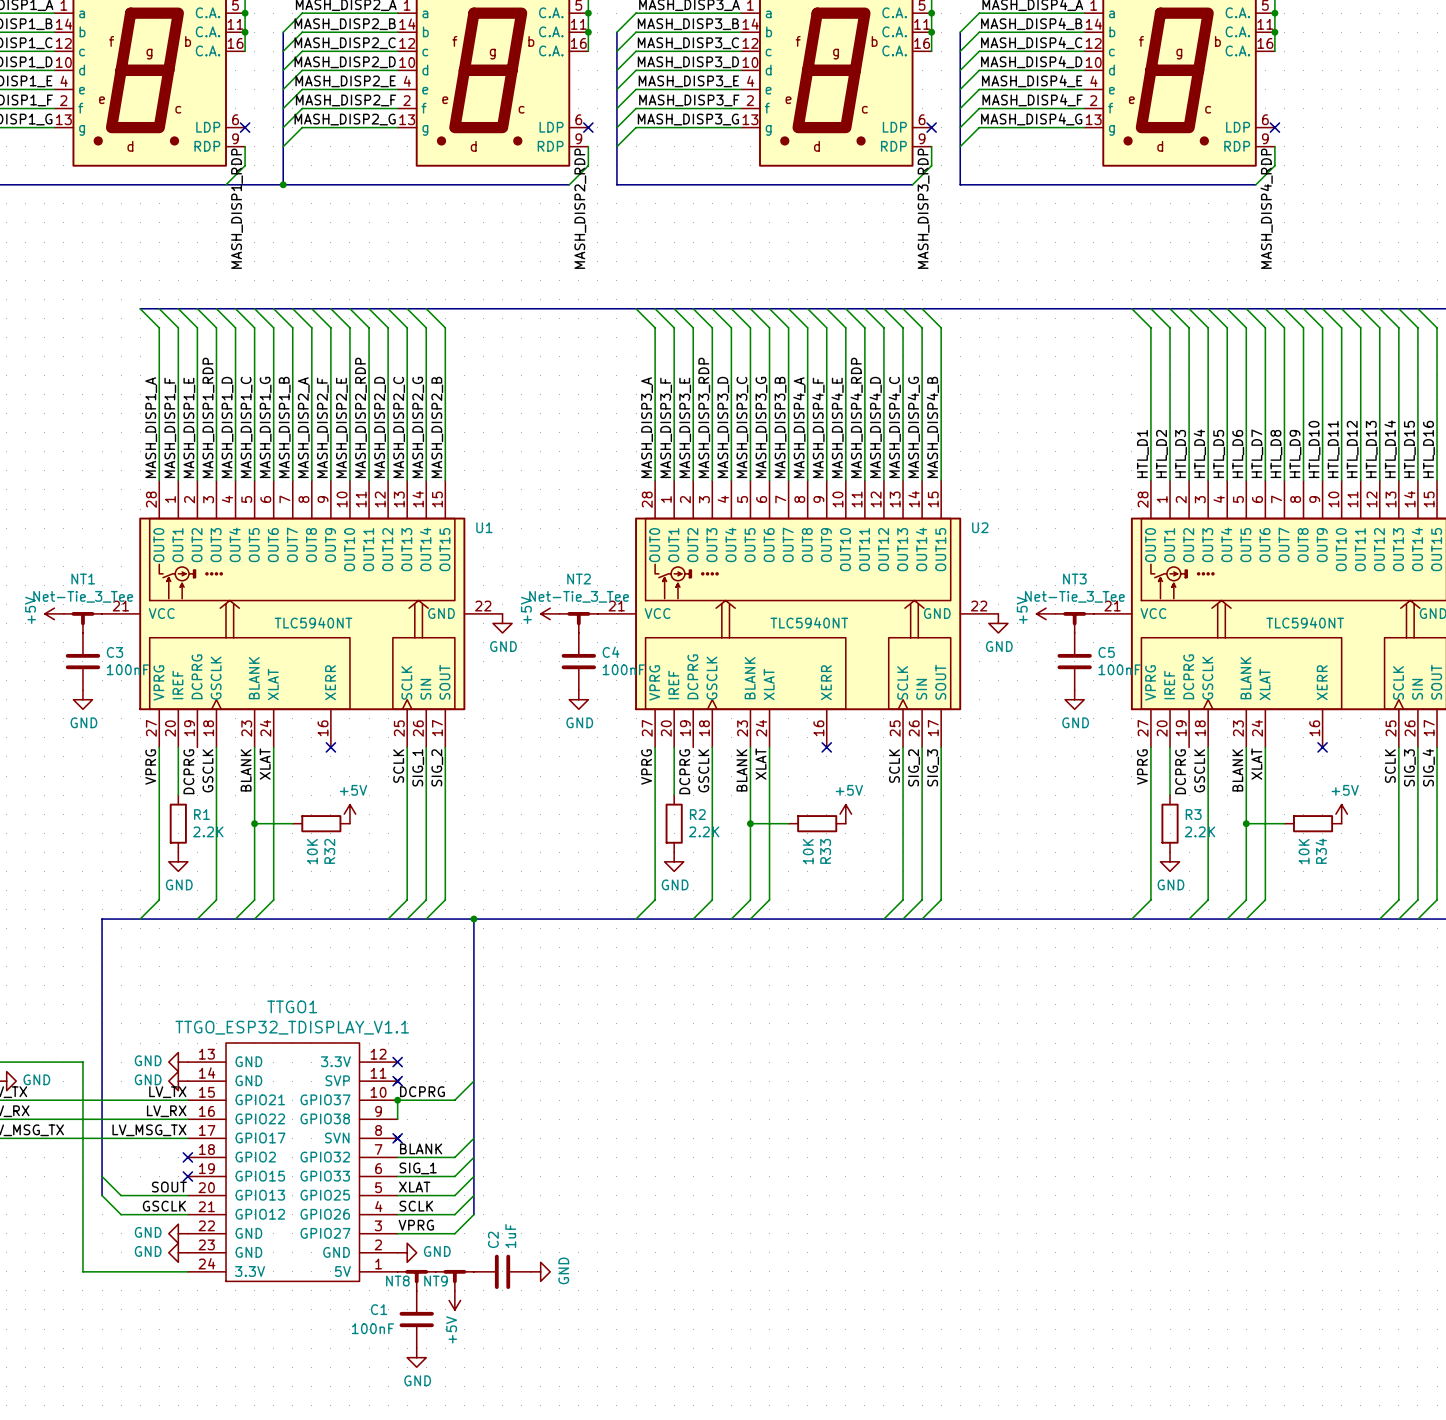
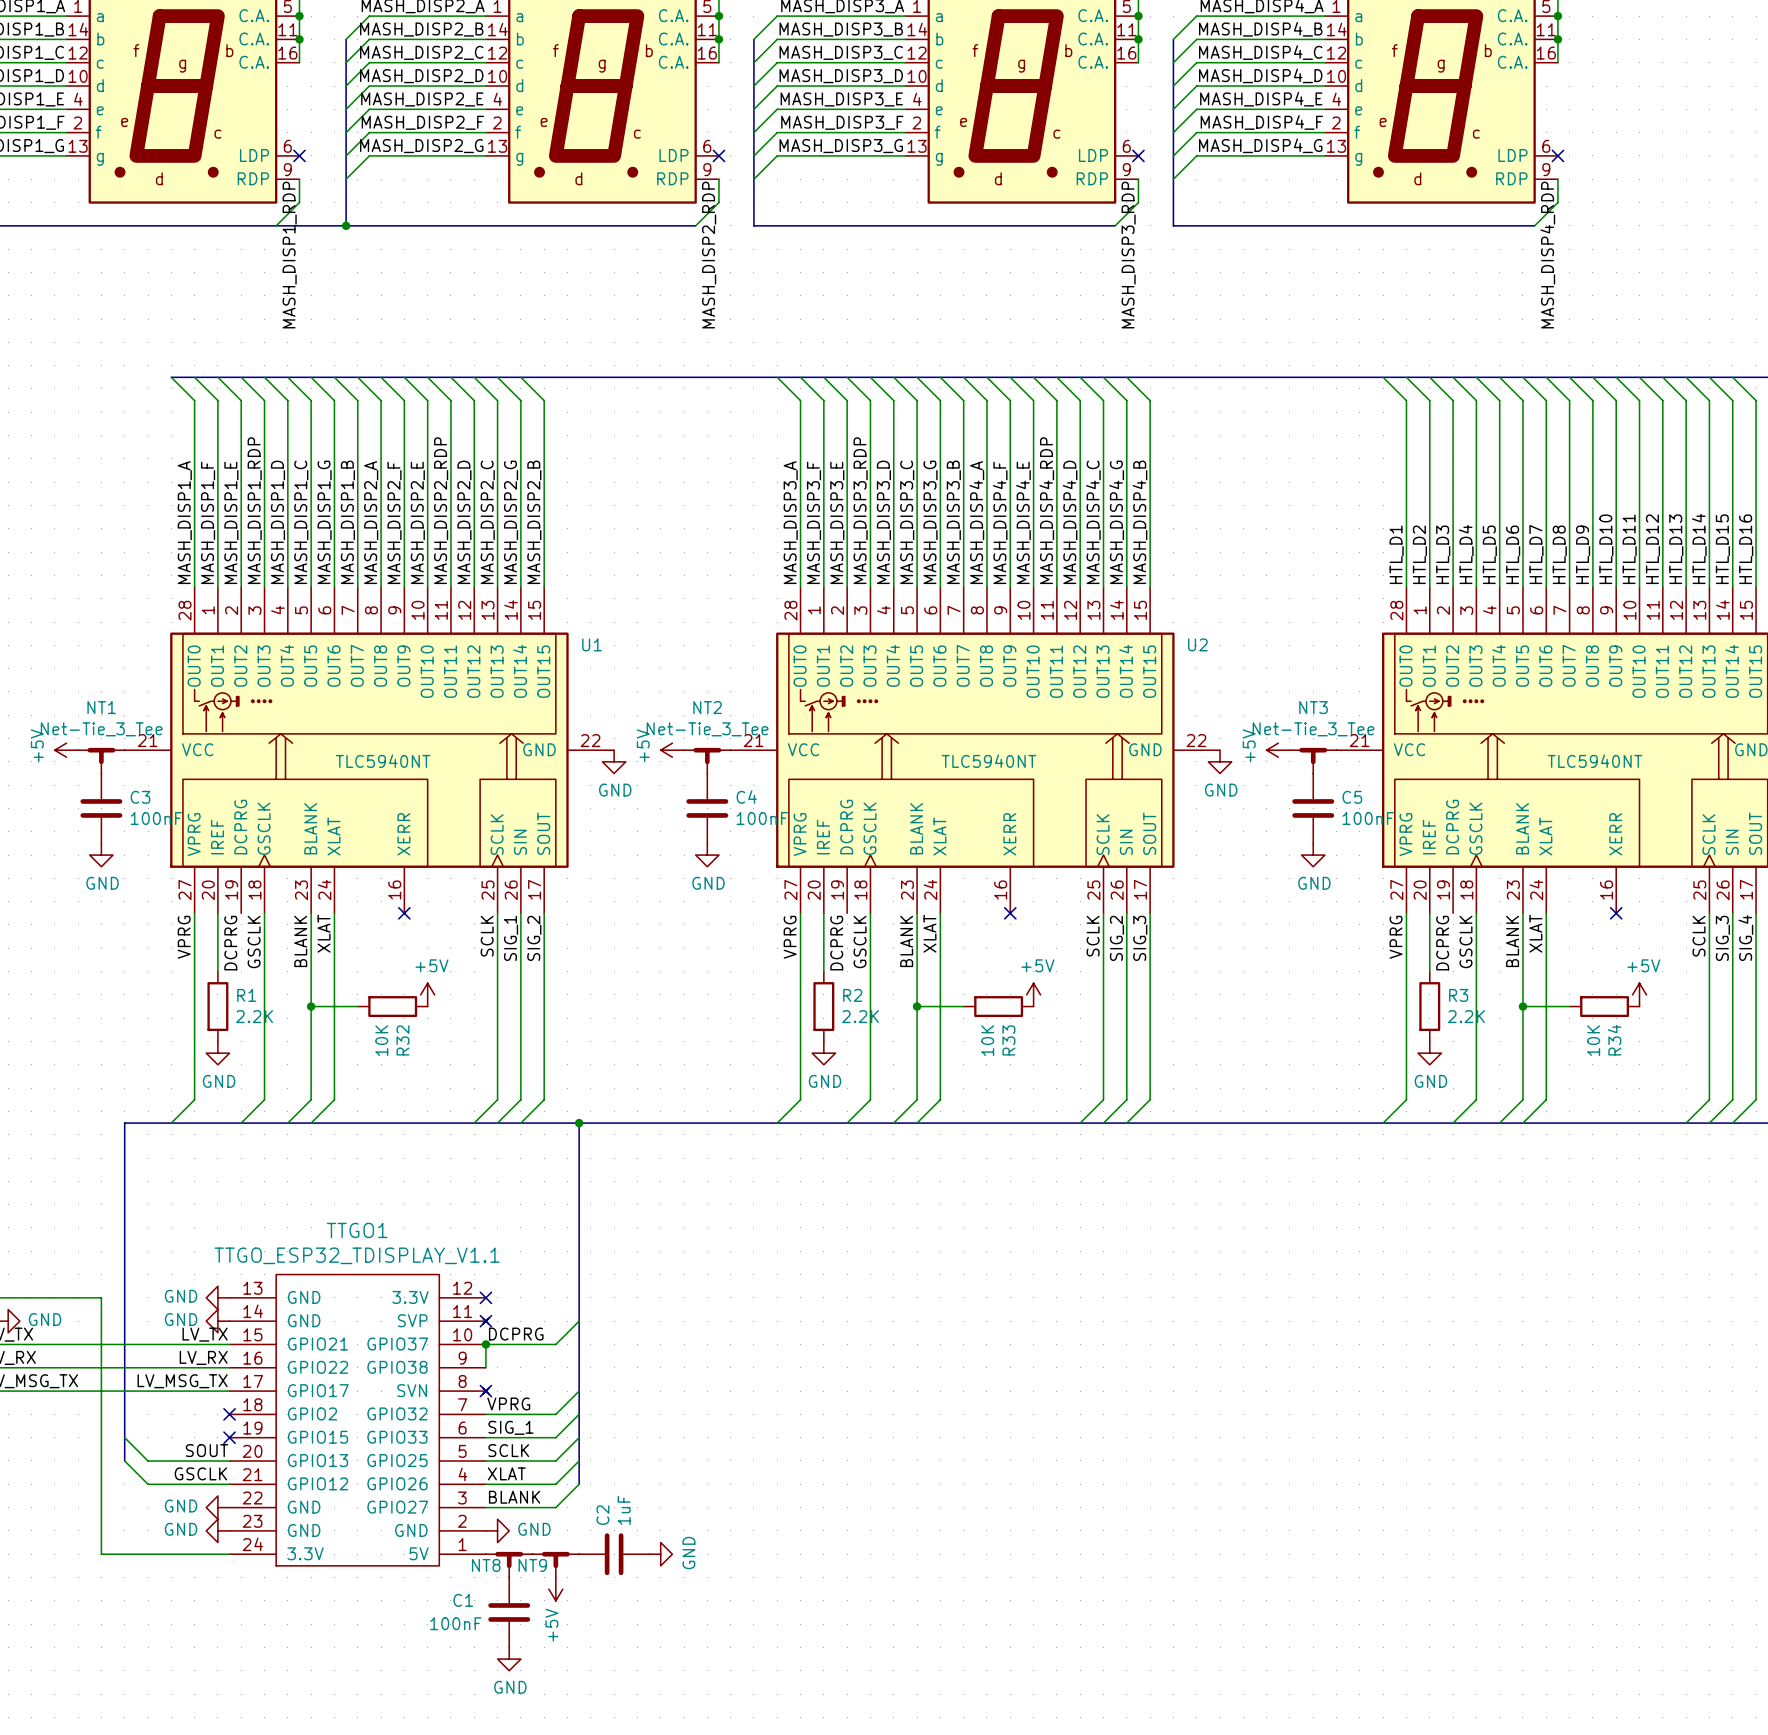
label: BLANK (421, 1148) -> VPRG (508, 1403)
label: XLAT (414, 1187) -> SCLK (508, 1450)
label: SCLK (416, 1206) -> XLAT (506, 1473)
label: VPRG (416, 1225) -> BLANK (514, 1497)

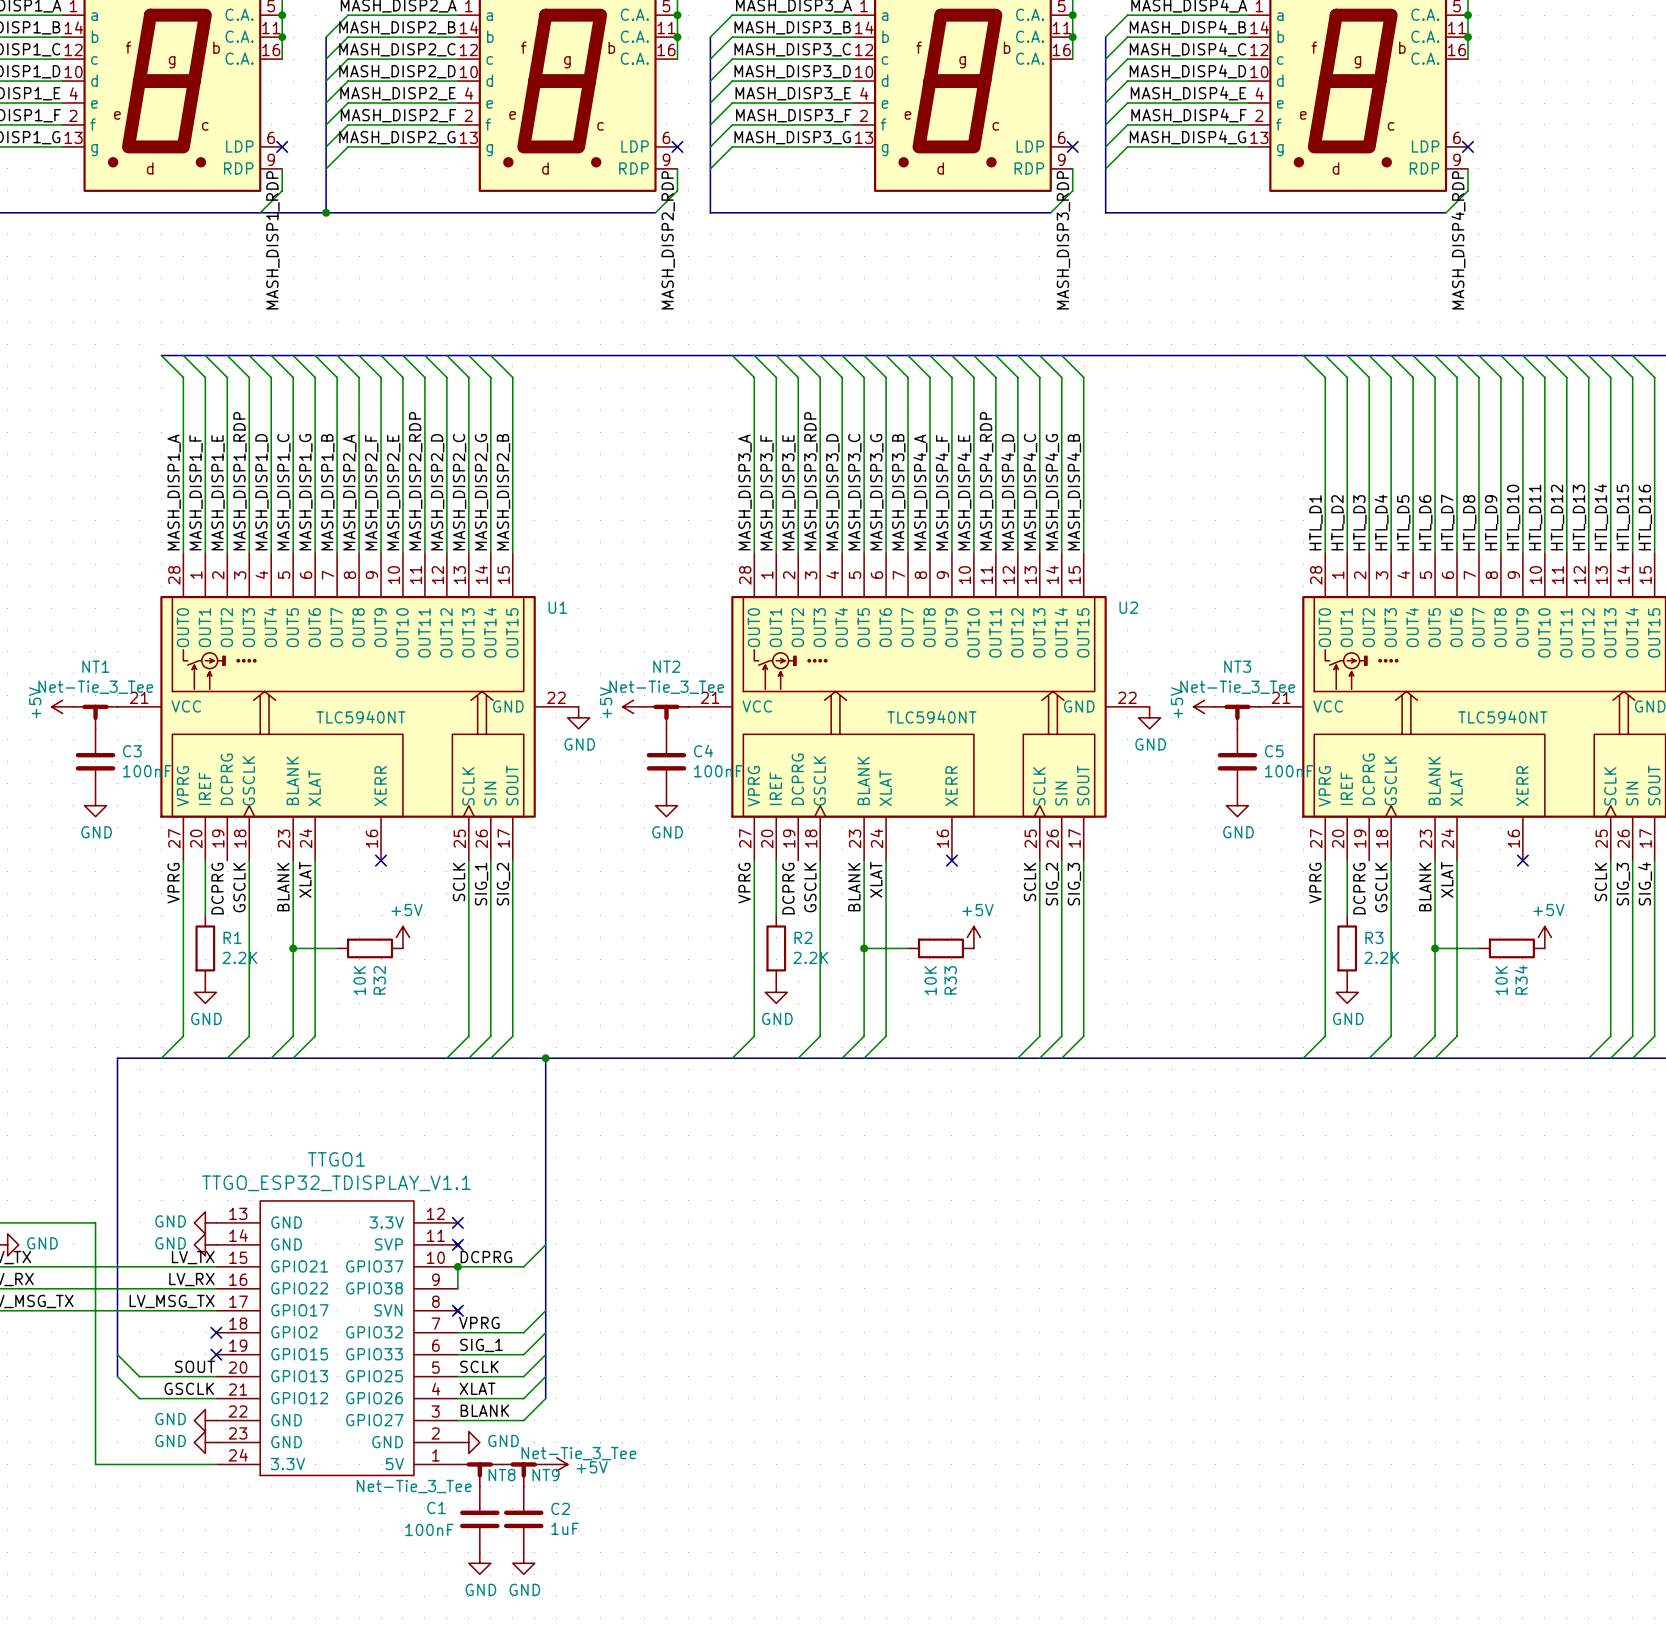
NT9 value: none -> Net-Tie_3_Tee (578, 1453)
C2 rotation: 0° (614, 1554) -> 90° clockwise (523, 1519)
C2 position: (614, 1554) -> (523, 1519)
power symbol rotation: 0° (660, 1554) -> 90° clockwise (523, 1563)
power symbol position: GND (660, 1554) -> GND (523, 1563)
NT8 name position: NT8 (486, 1565) -> NT8 (502, 1475)
NT9 name position: NT9 (532, 1565) -> NT9 (545, 1475)
NT8 value: none -> Net-Tie_3_Tee (414, 1486)
power symbol rotation: 0° (555, 1589) -> 90° counterclockwise (556, 1464)
power symbol position: +5V (555, 1589) -> +5V (556, 1464)

